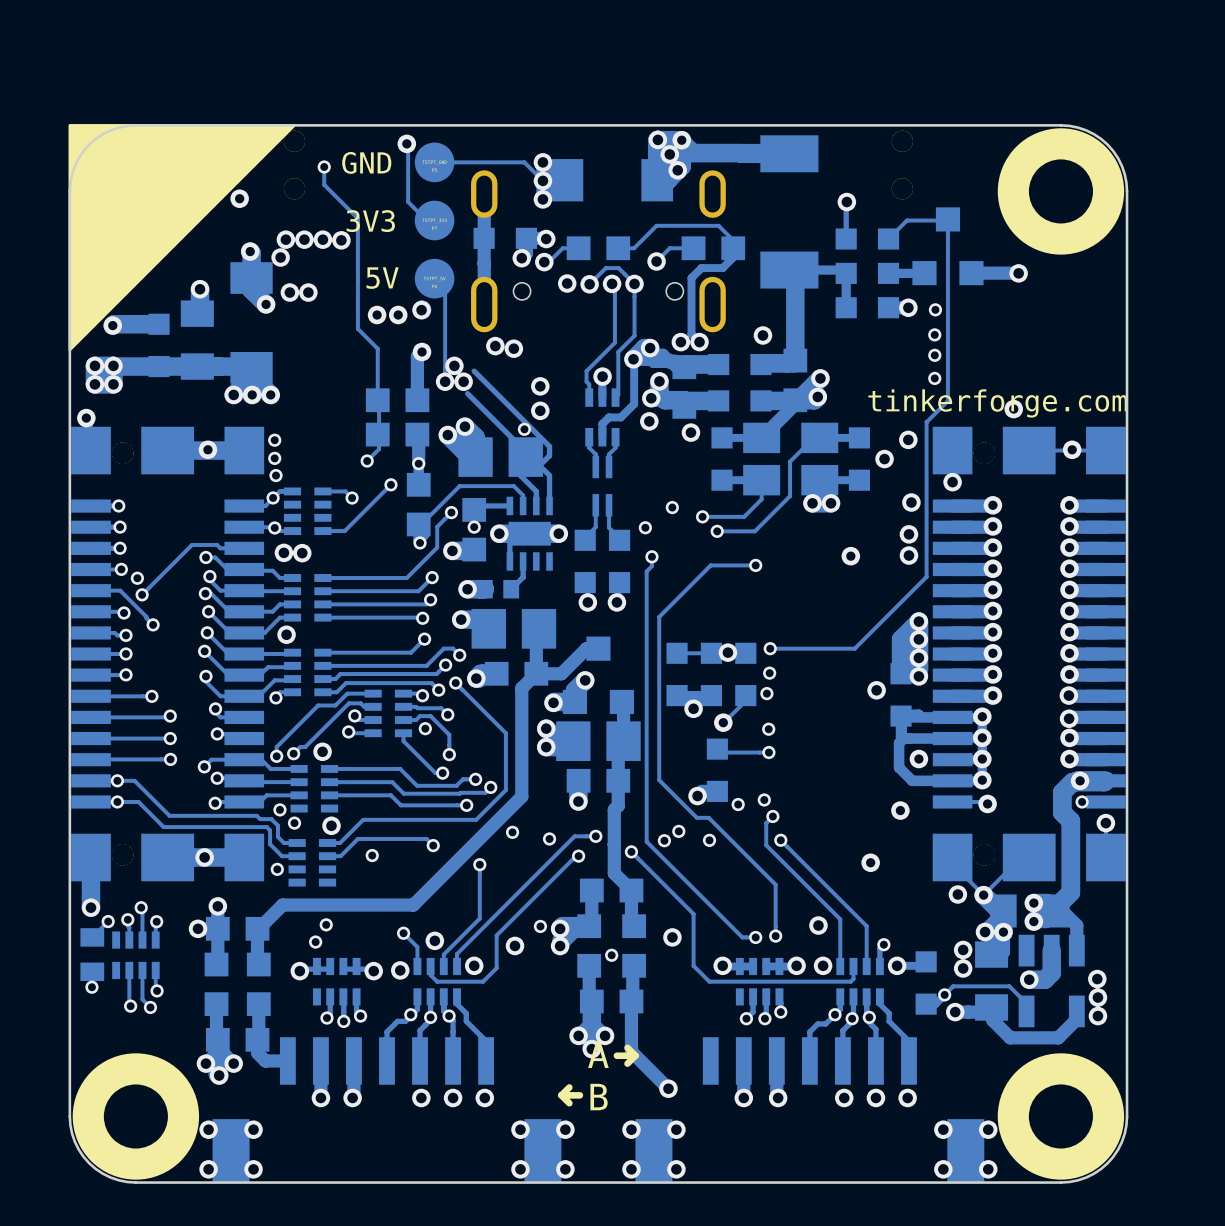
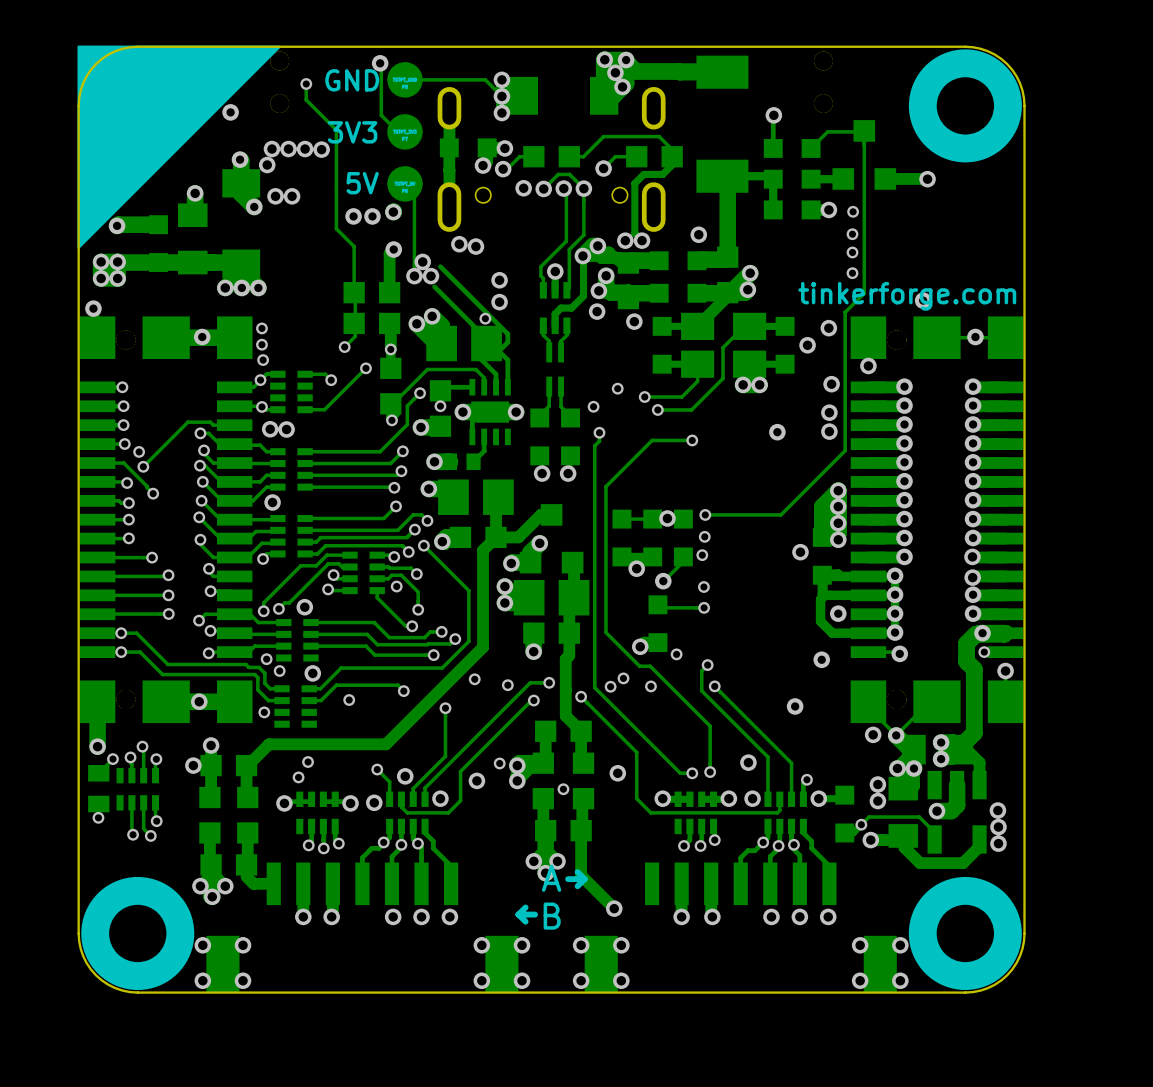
via: (764, 799) -> none

